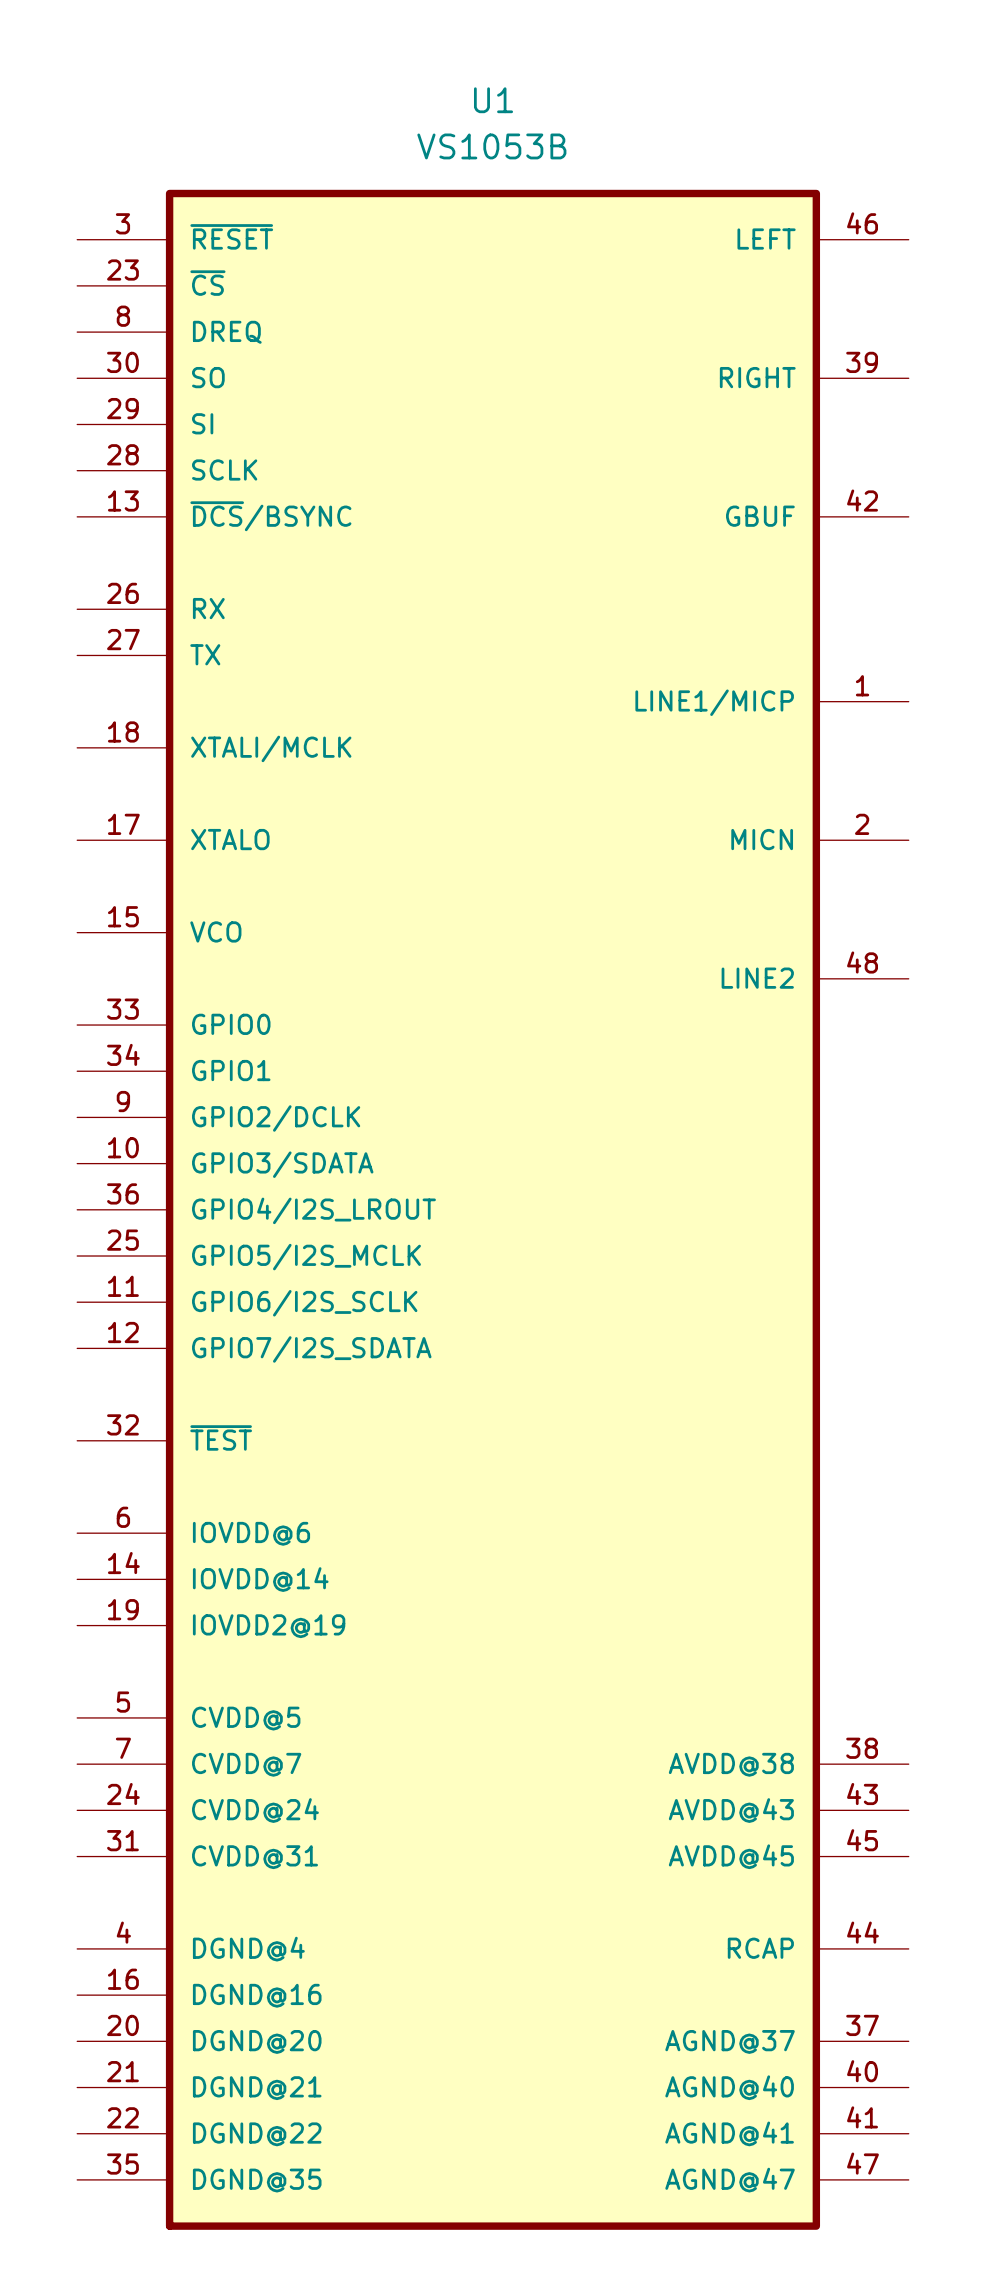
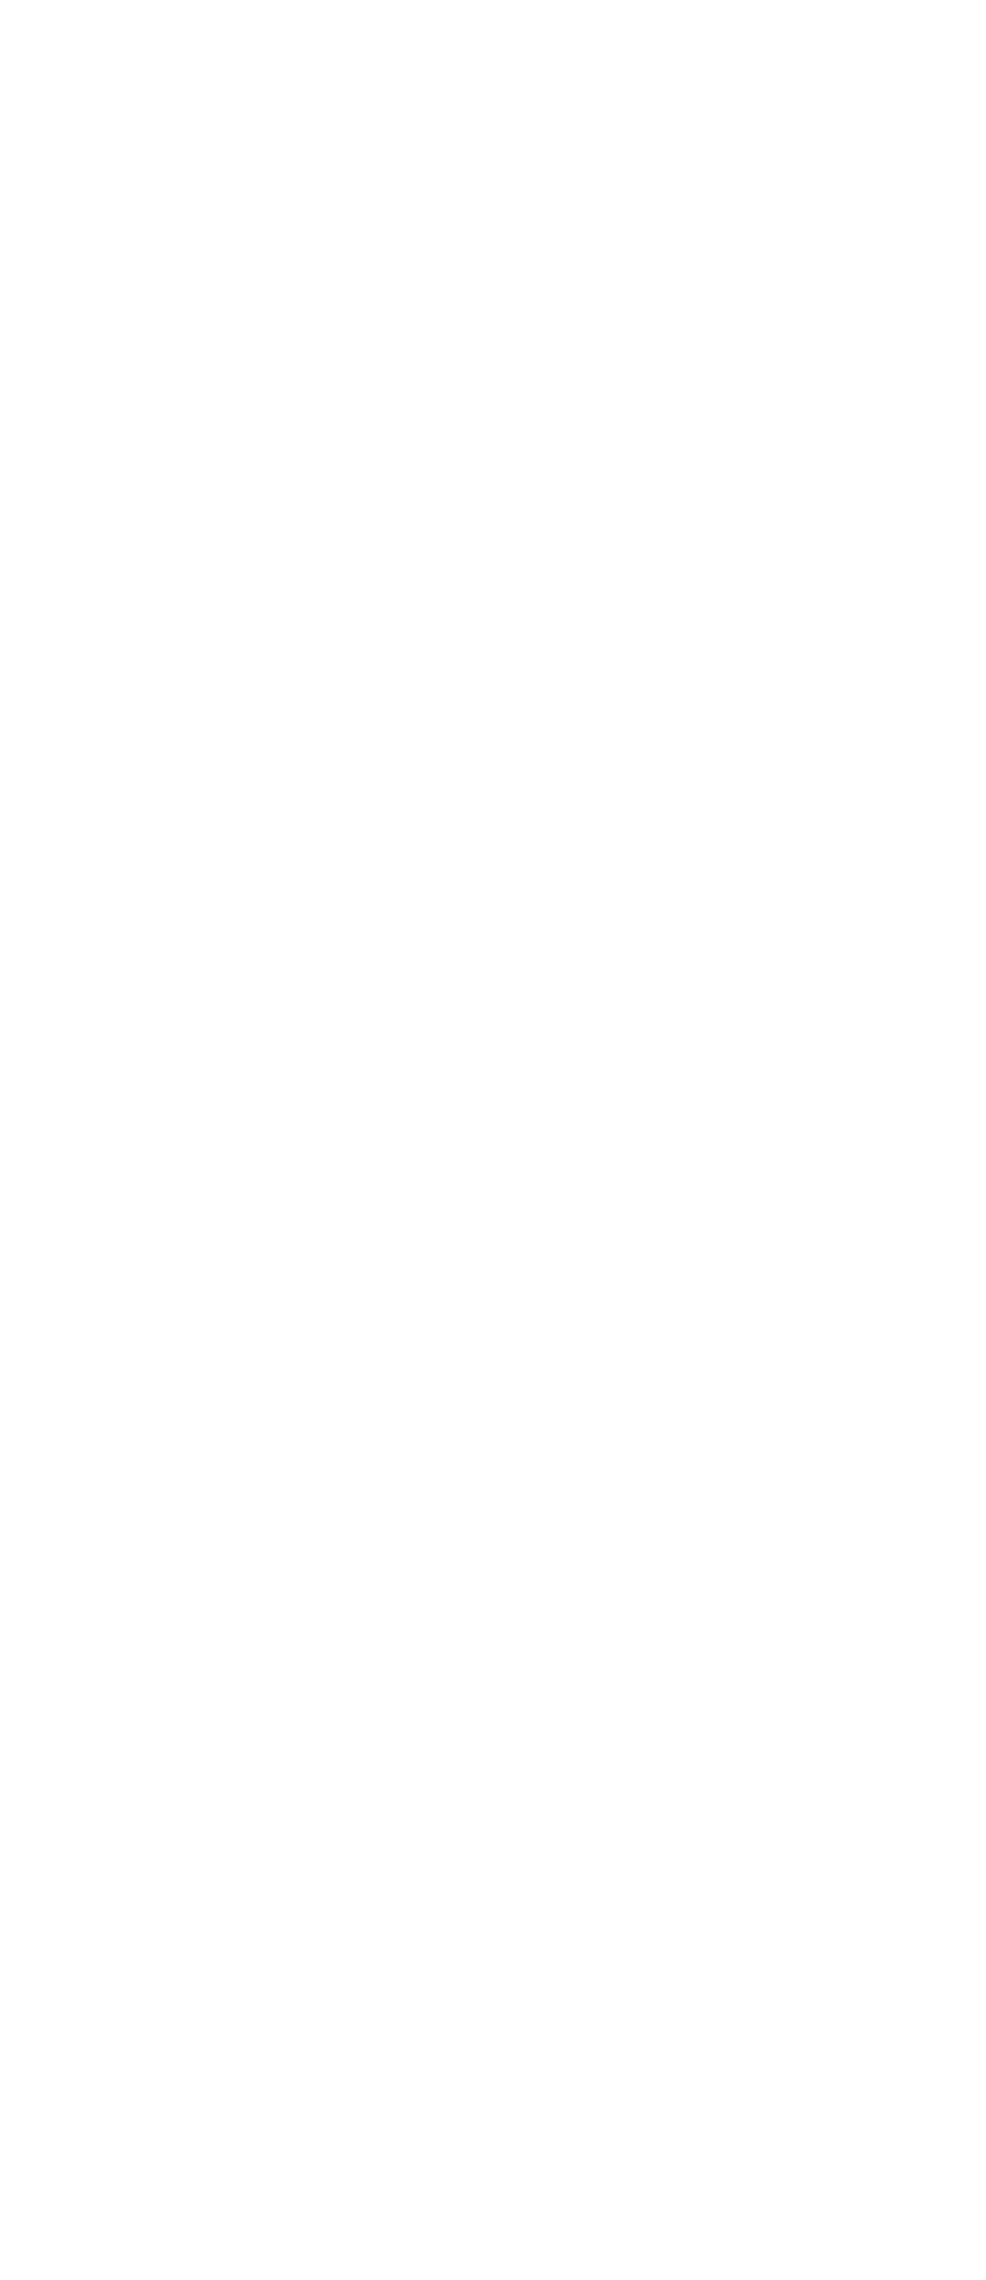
U1: VS1053B (492, 1209) -> none

